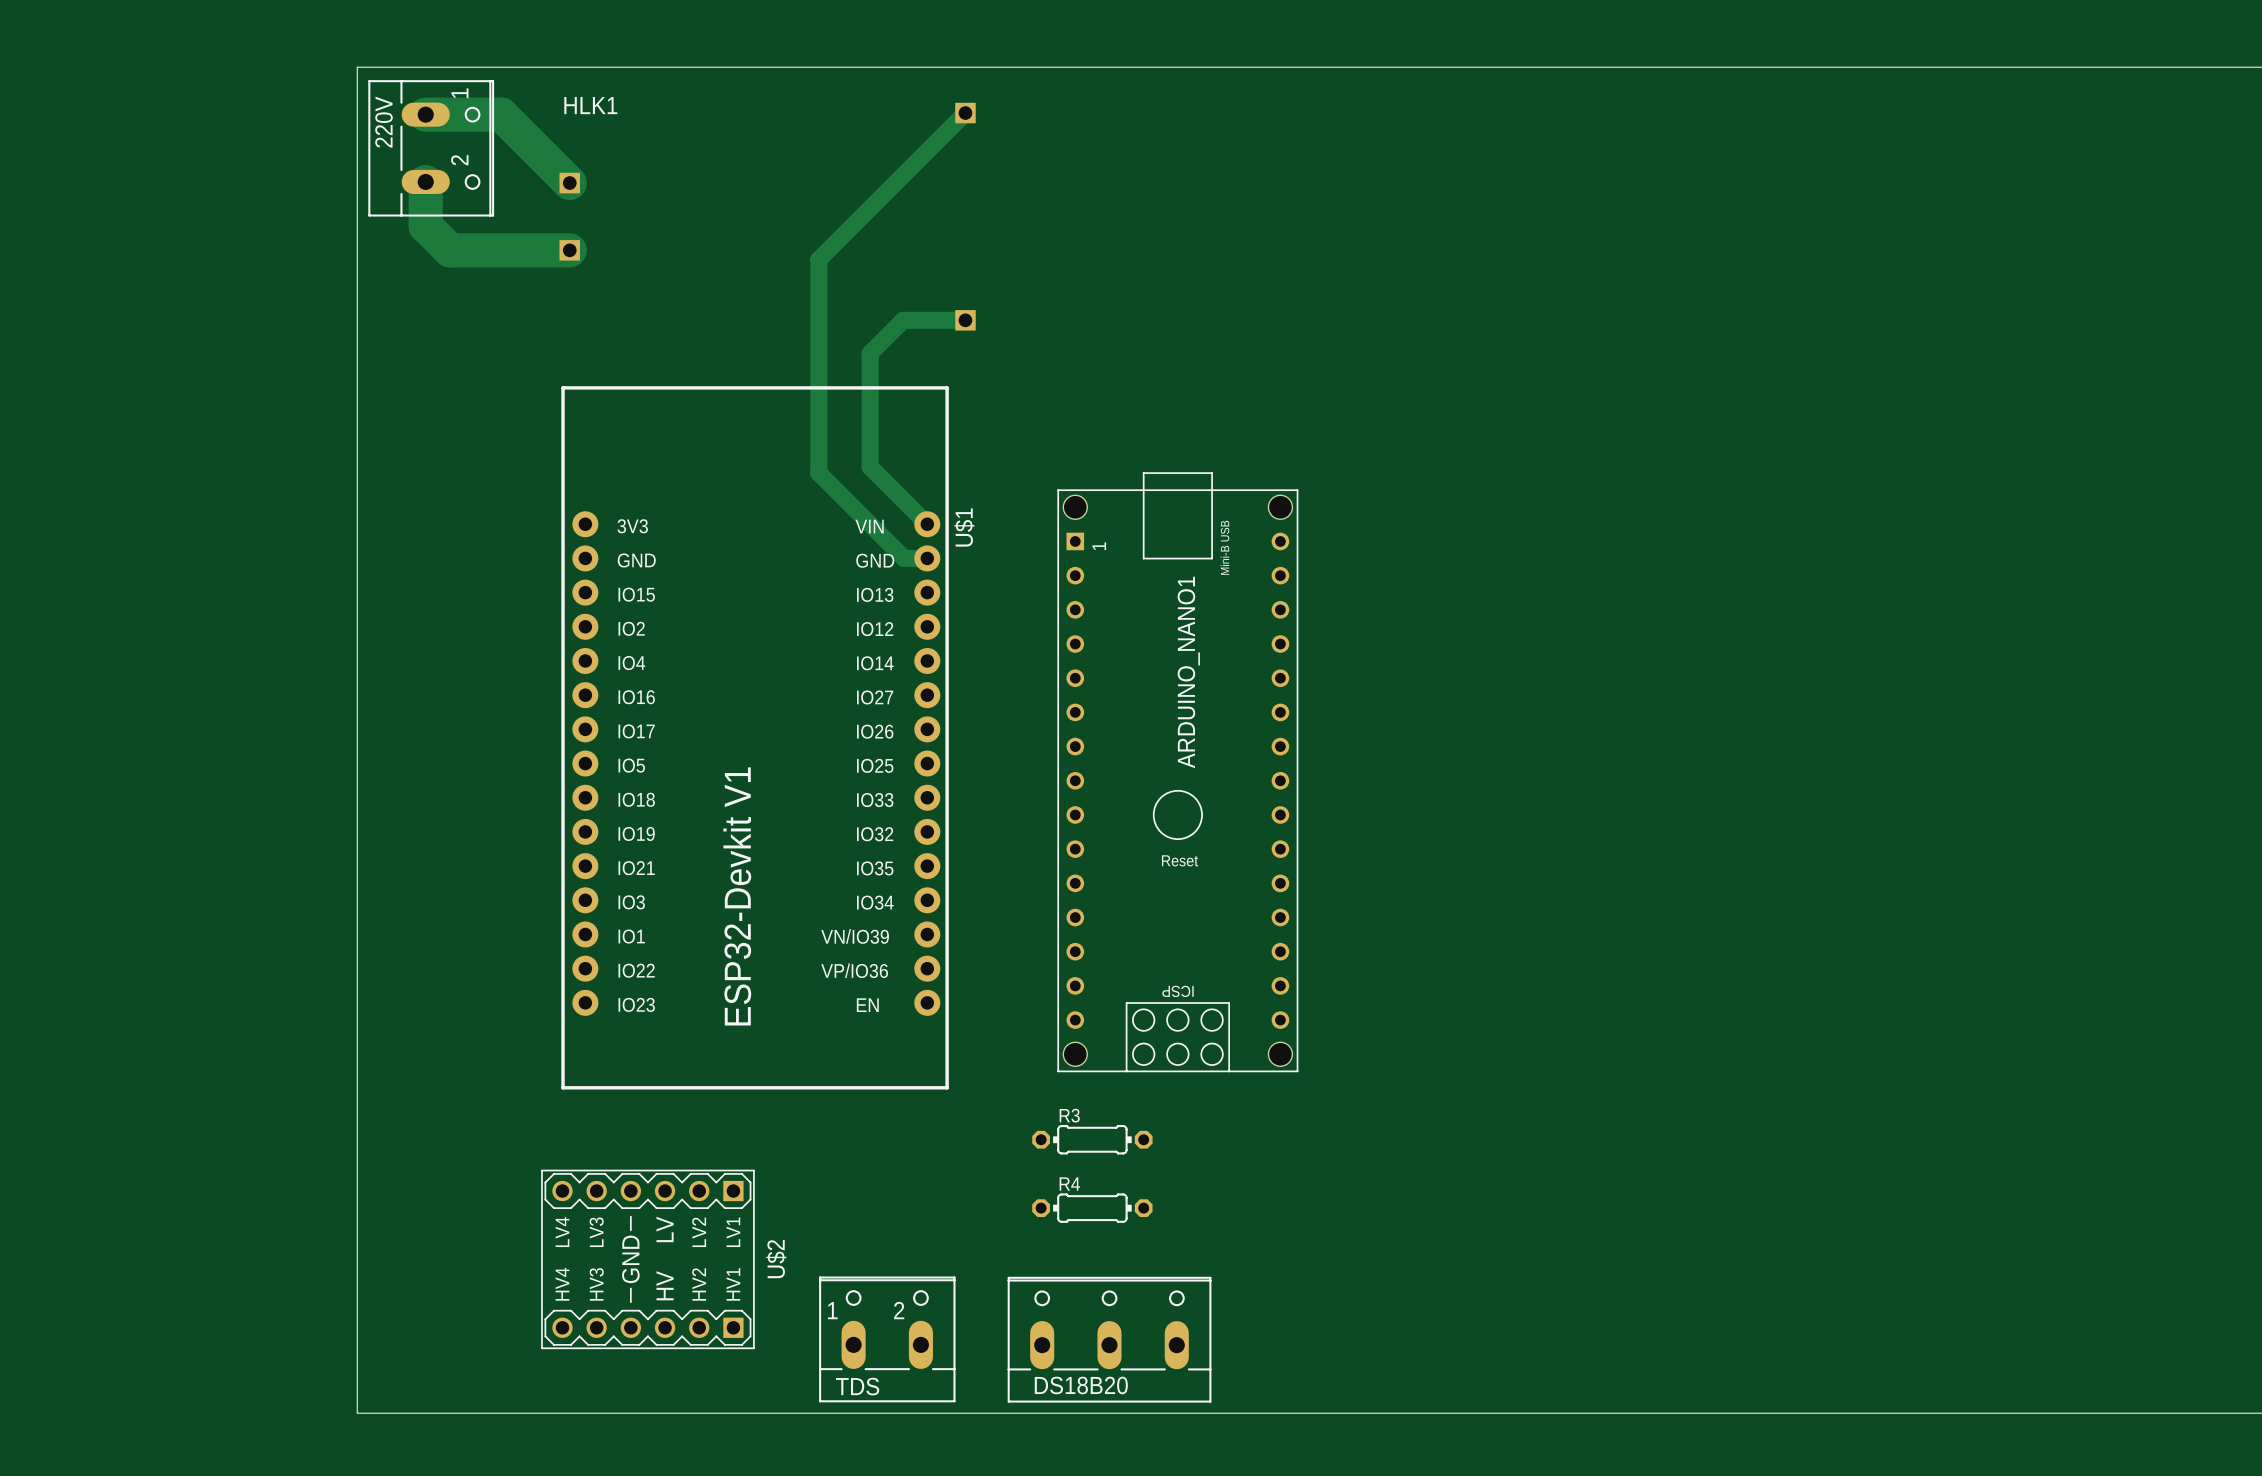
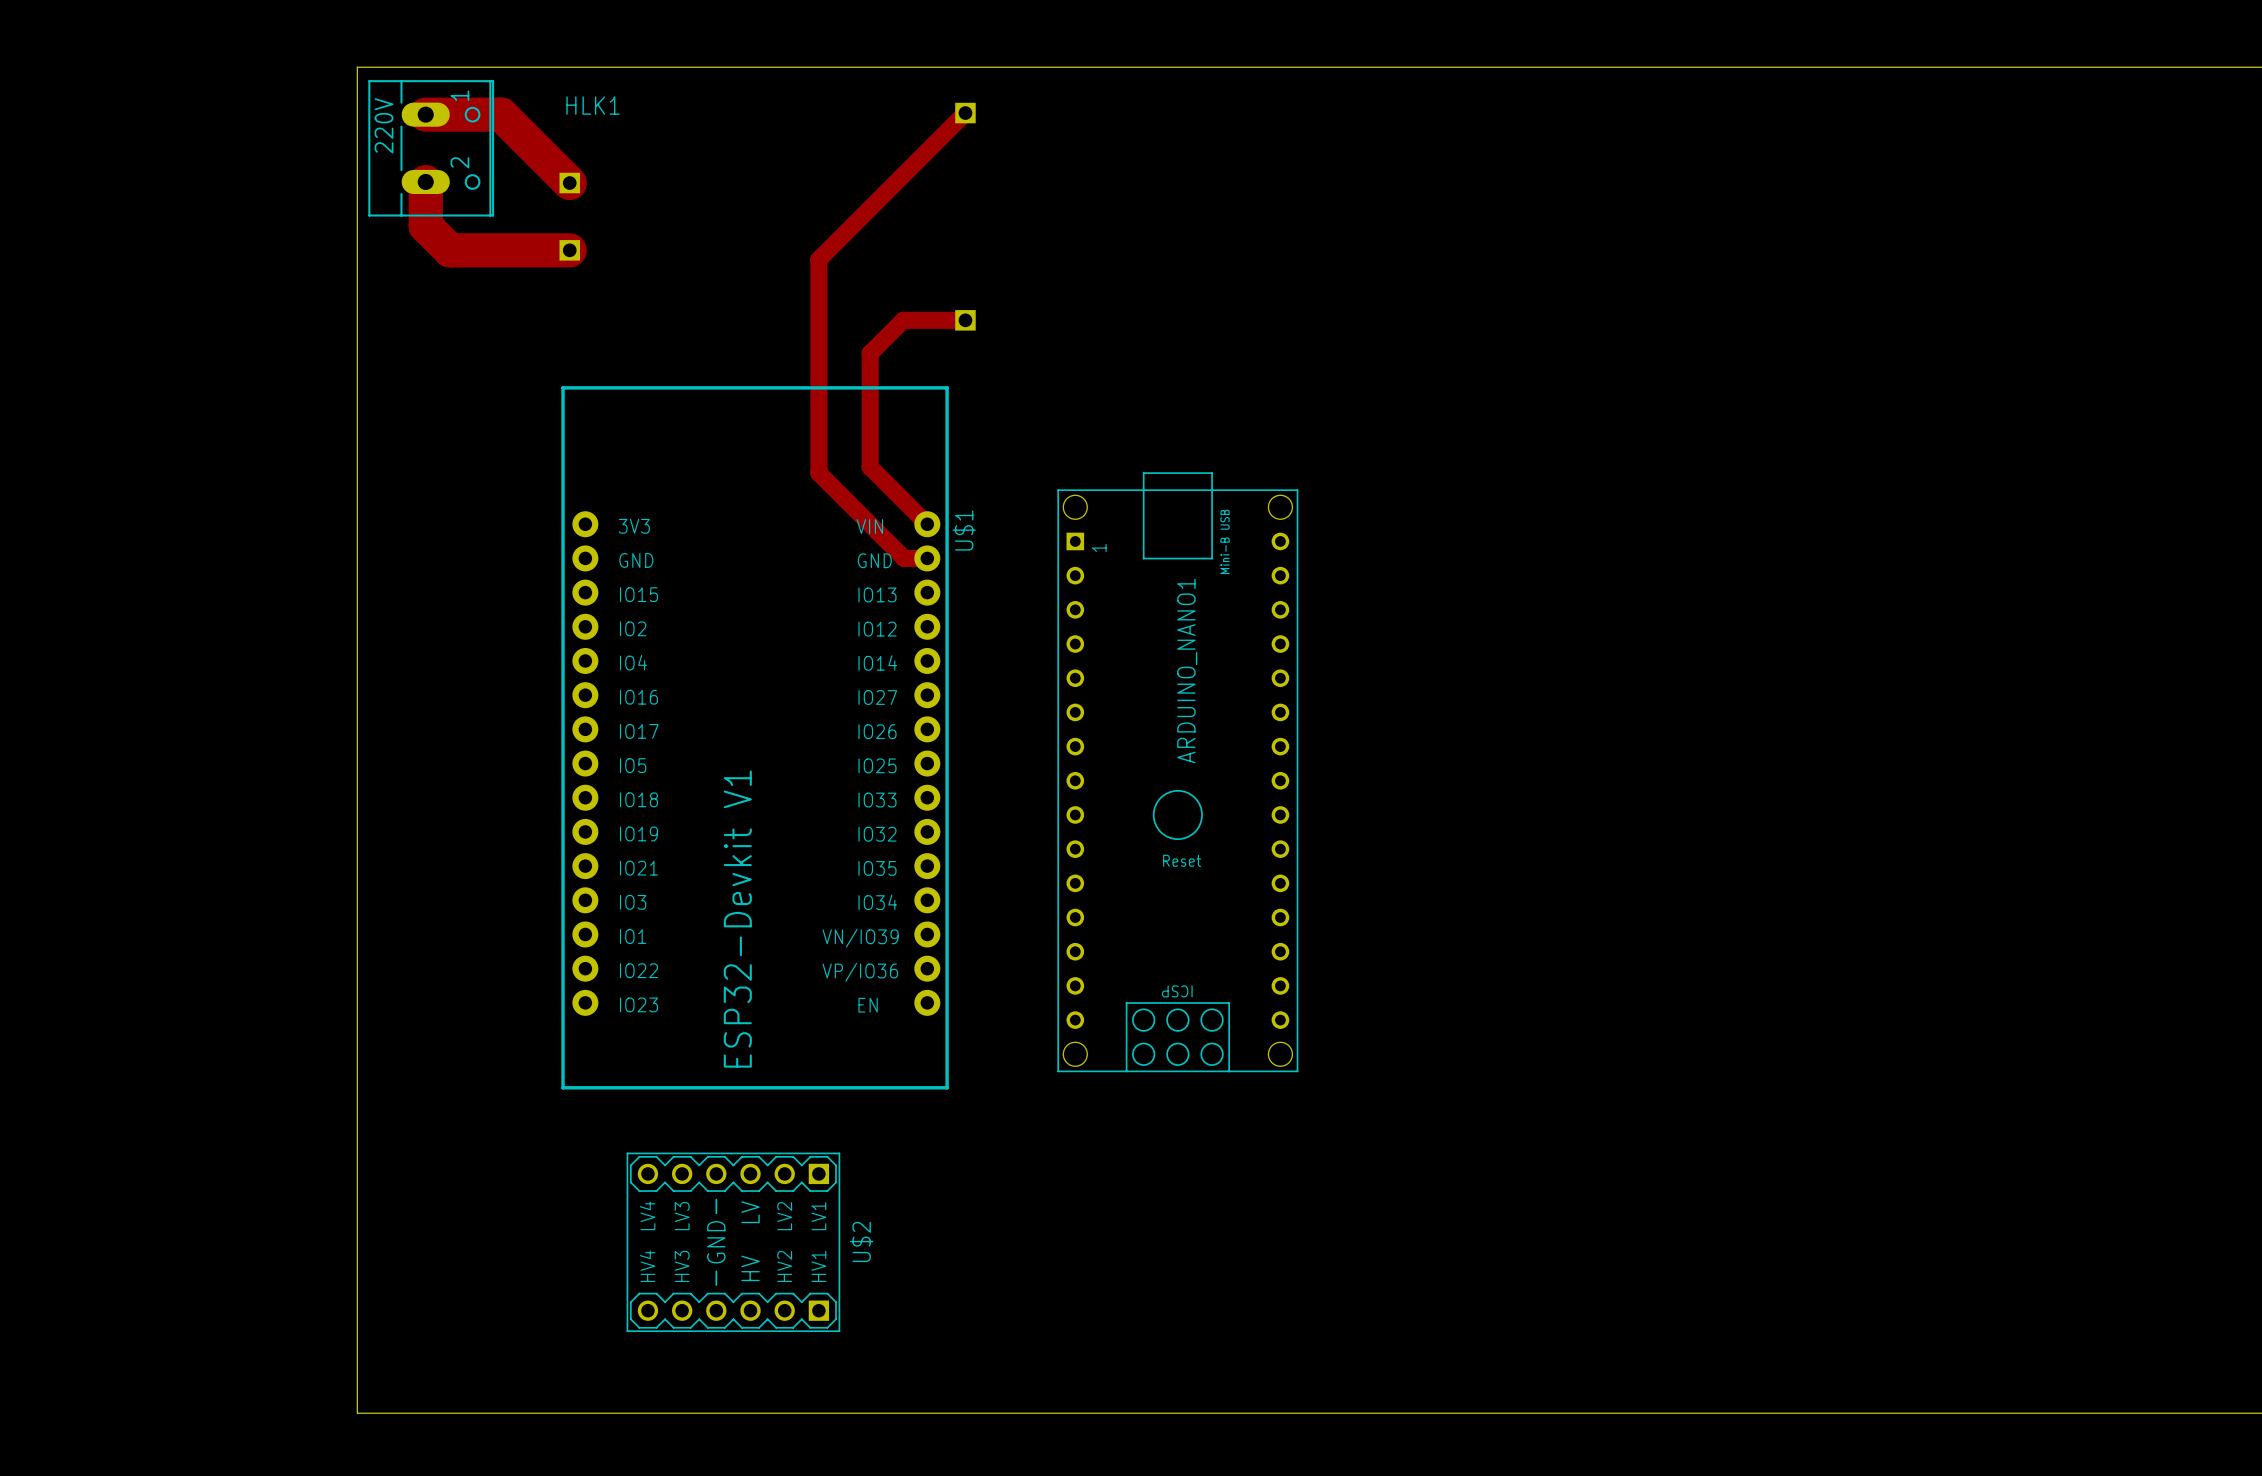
R3: (1092, 1139) -> none
R4: (1092, 1208) -> none
U$2 position: (647, 1259) -> (733, 1242)
TDS: (887, 1339) -> none
DS18B20: (1109, 1339) -> none

